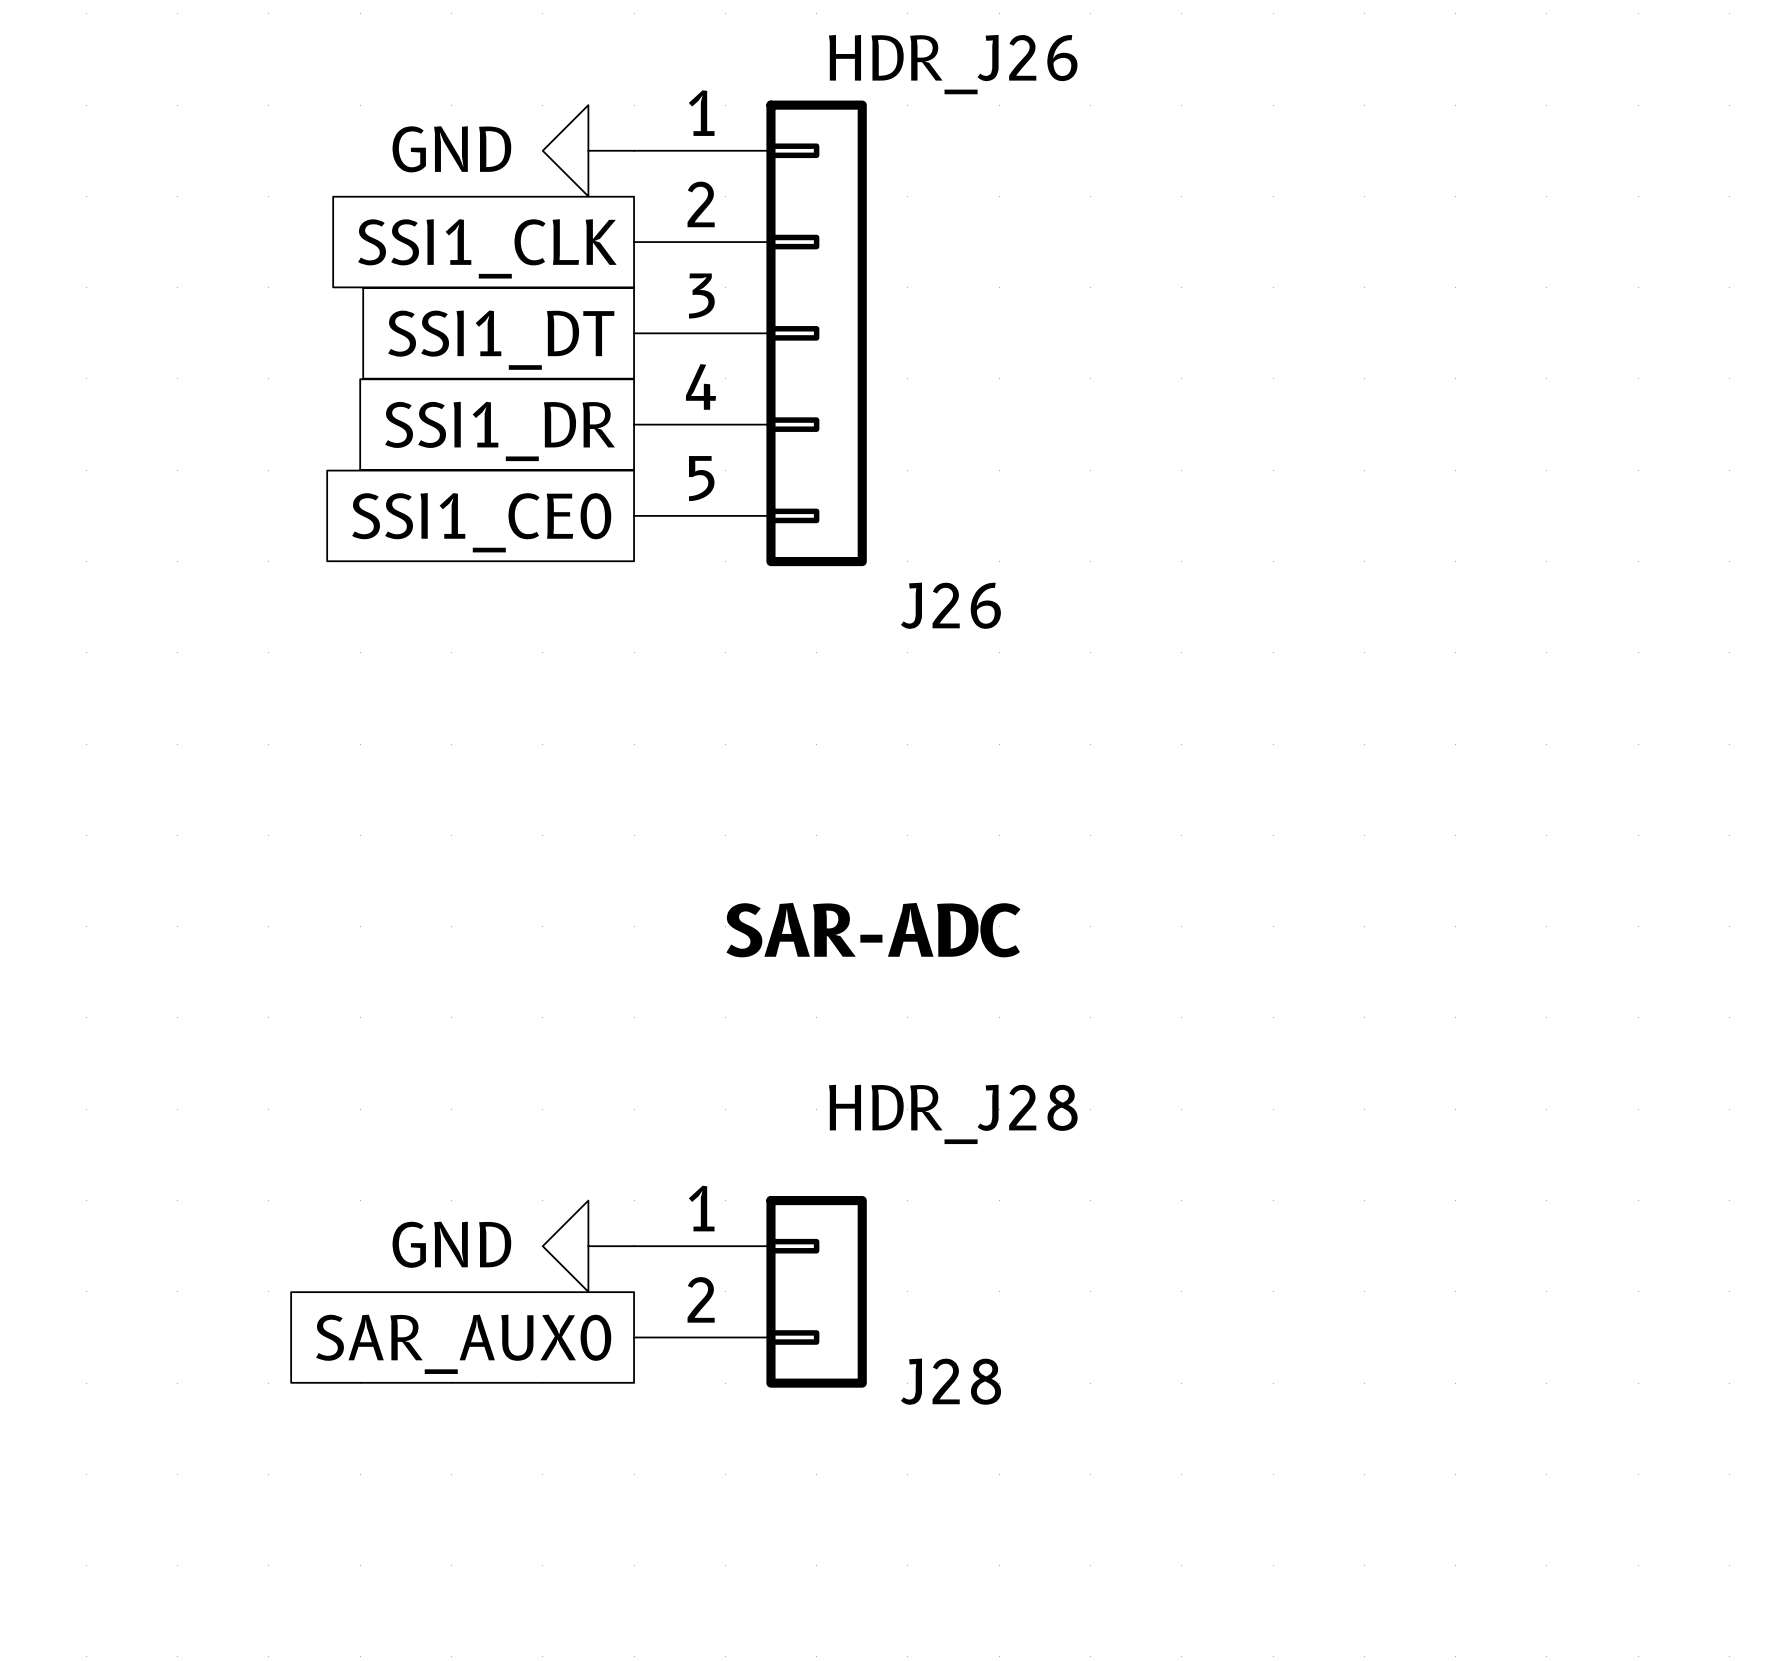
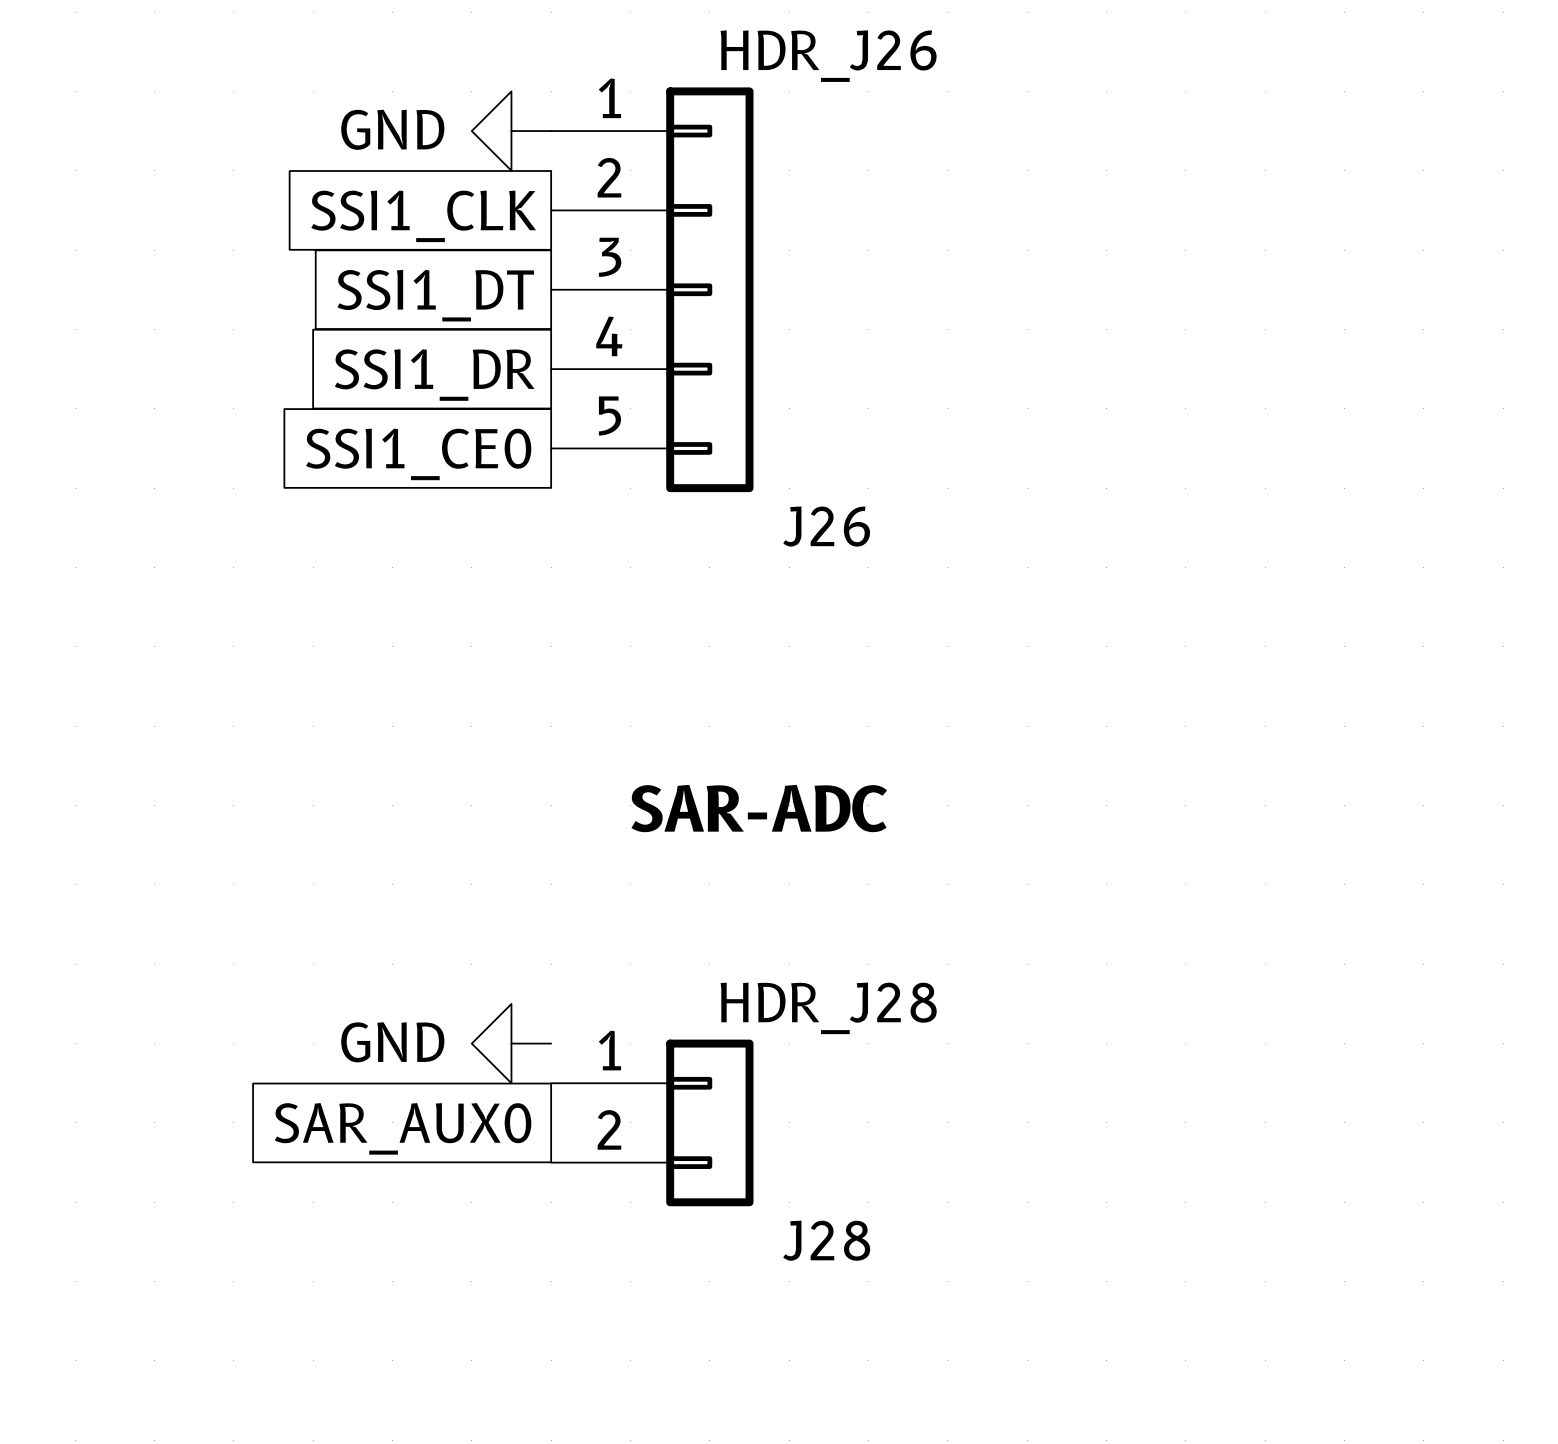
J28 value position: HDR_J28 (953, 1114) -> HDR_J28 (828, 1008)
power symbol position: GND (588, 1246) -> GND (511, 1043)
global label position: SAR_AUX0 (463, 1344) -> SAR_AUX0 (403, 1128)
J28 name position: J28 (951, 1381) -> J28 (826, 1240)

